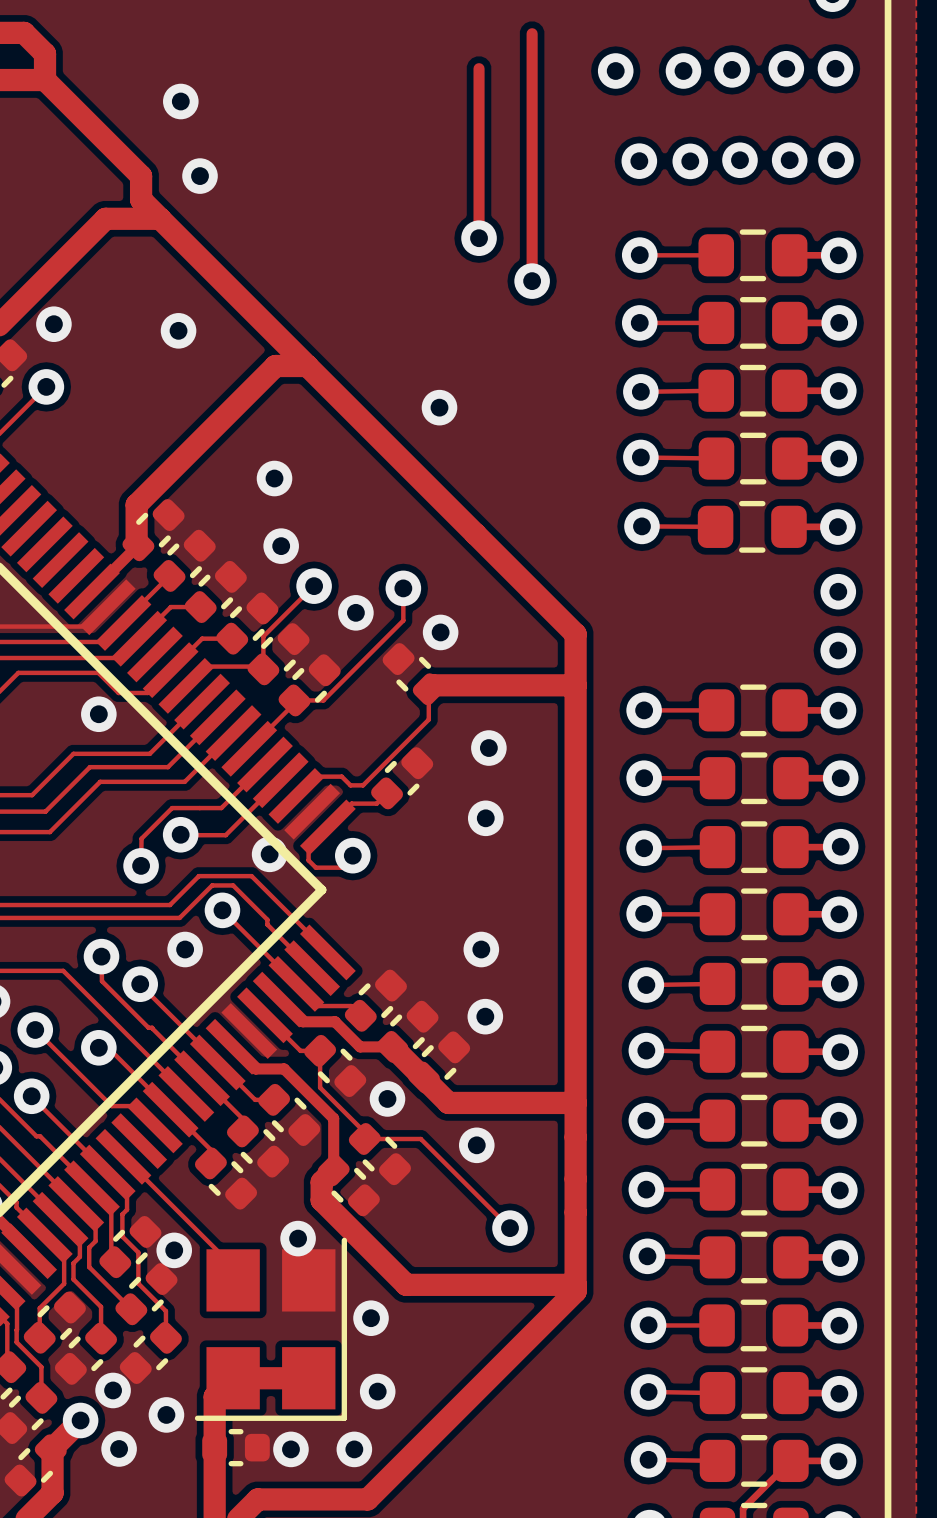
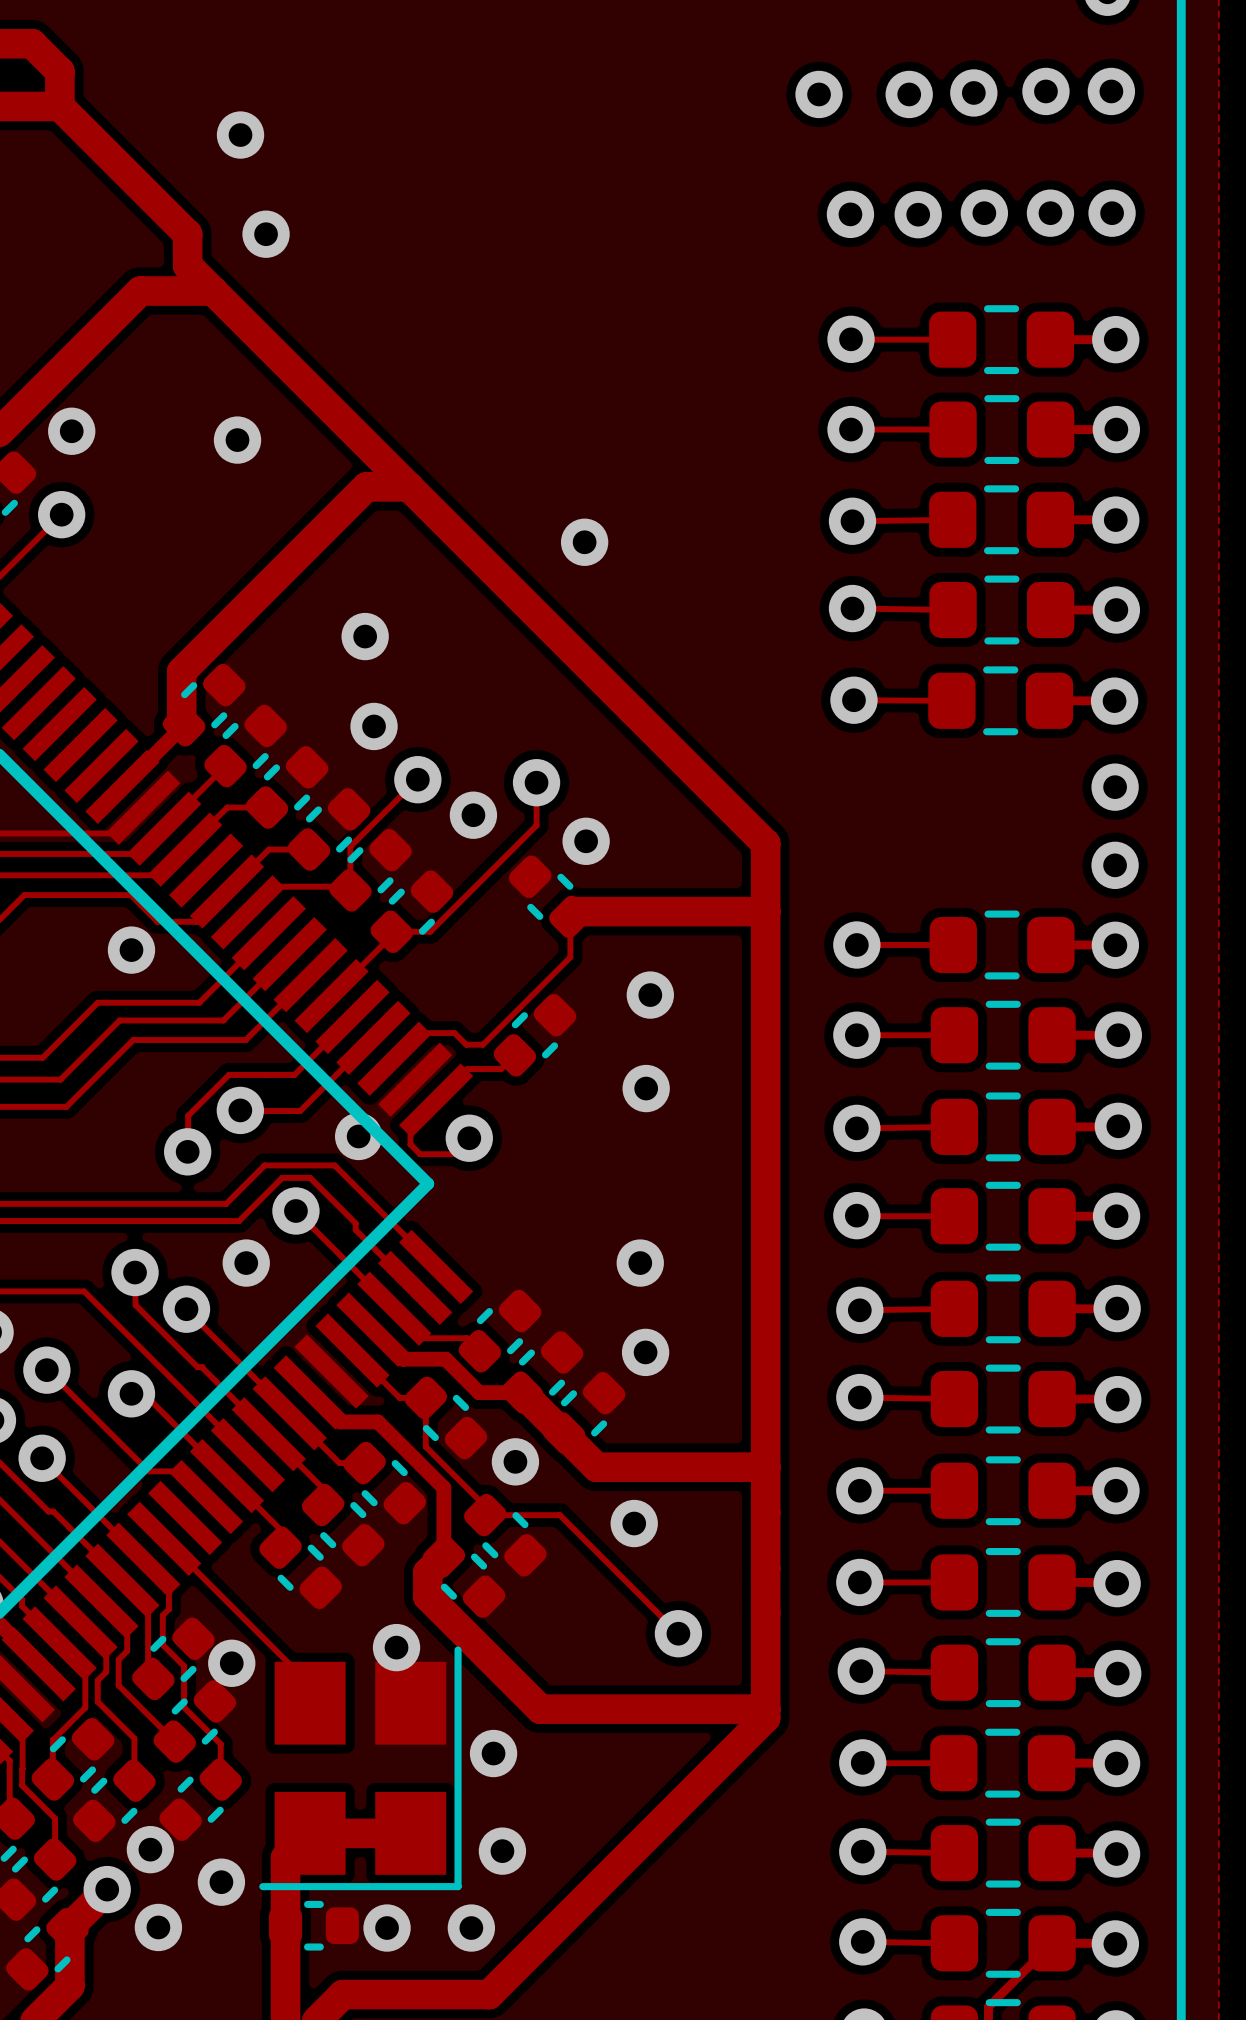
track: (532, 33) (532, 282) -> none
track: (479, 68) (479, 238) -> none
via: (479, 238) -> none
via: (532, 281) -> none

